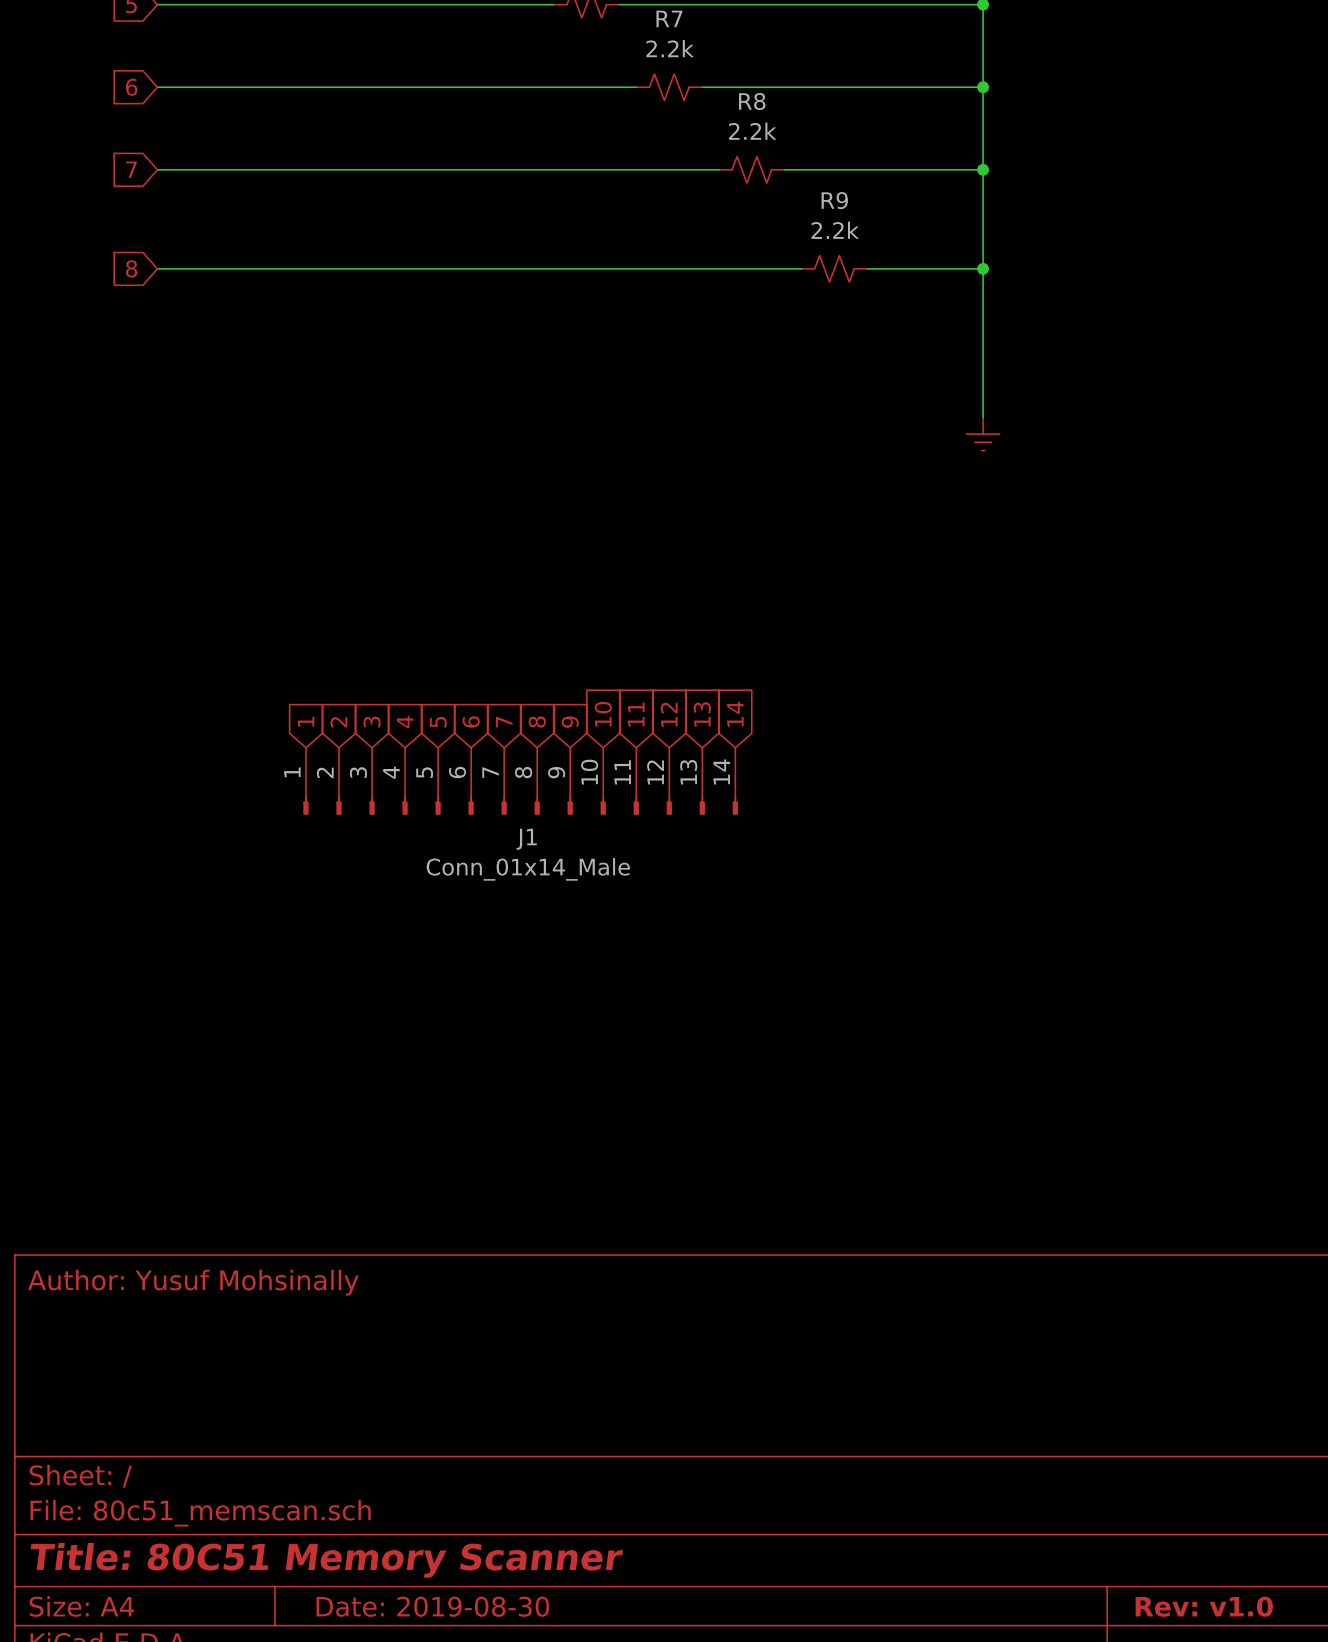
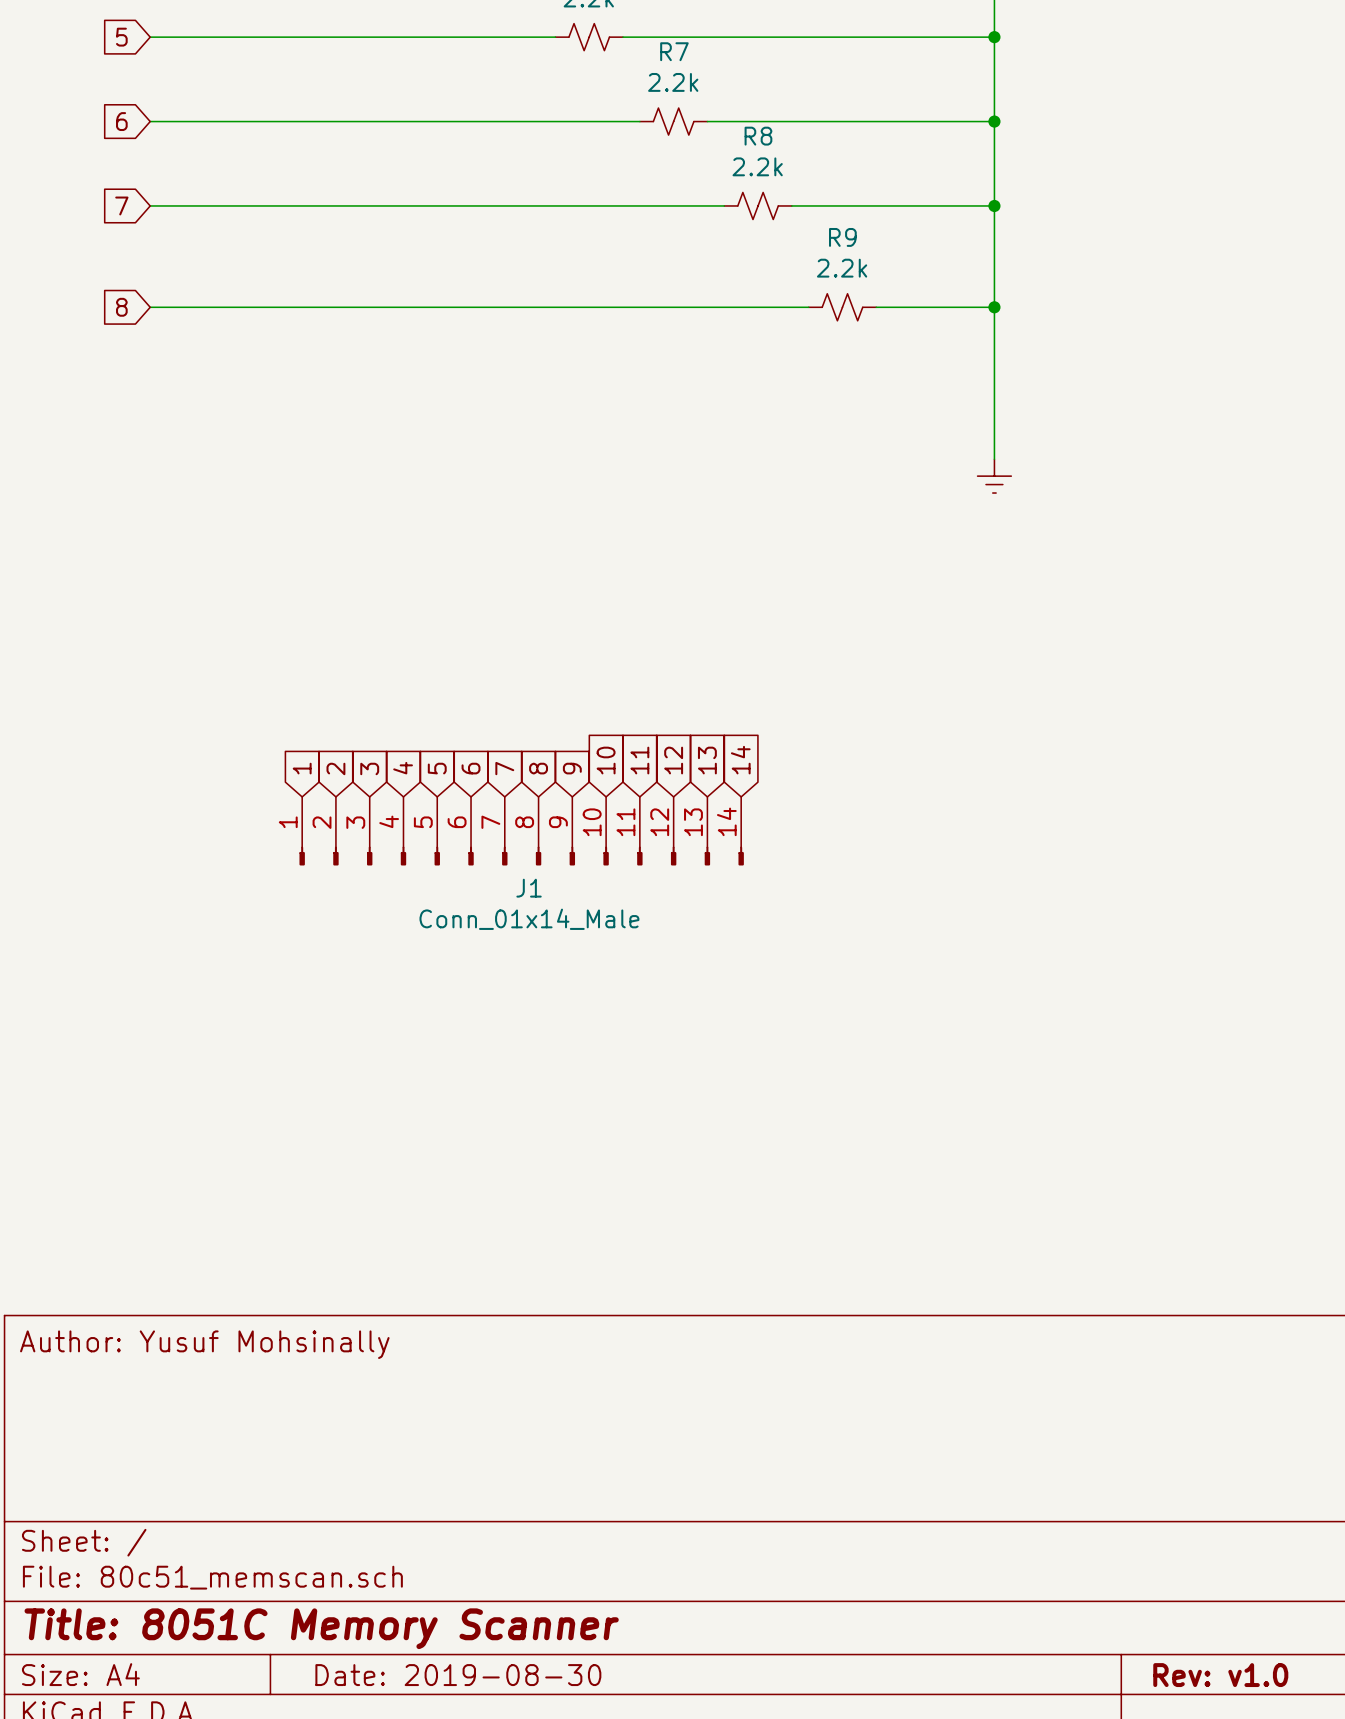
title block: Title: 80C51 Memory Scanner (326, 1560) -> Title: 8051C Memory Scanner (321, 1628)

